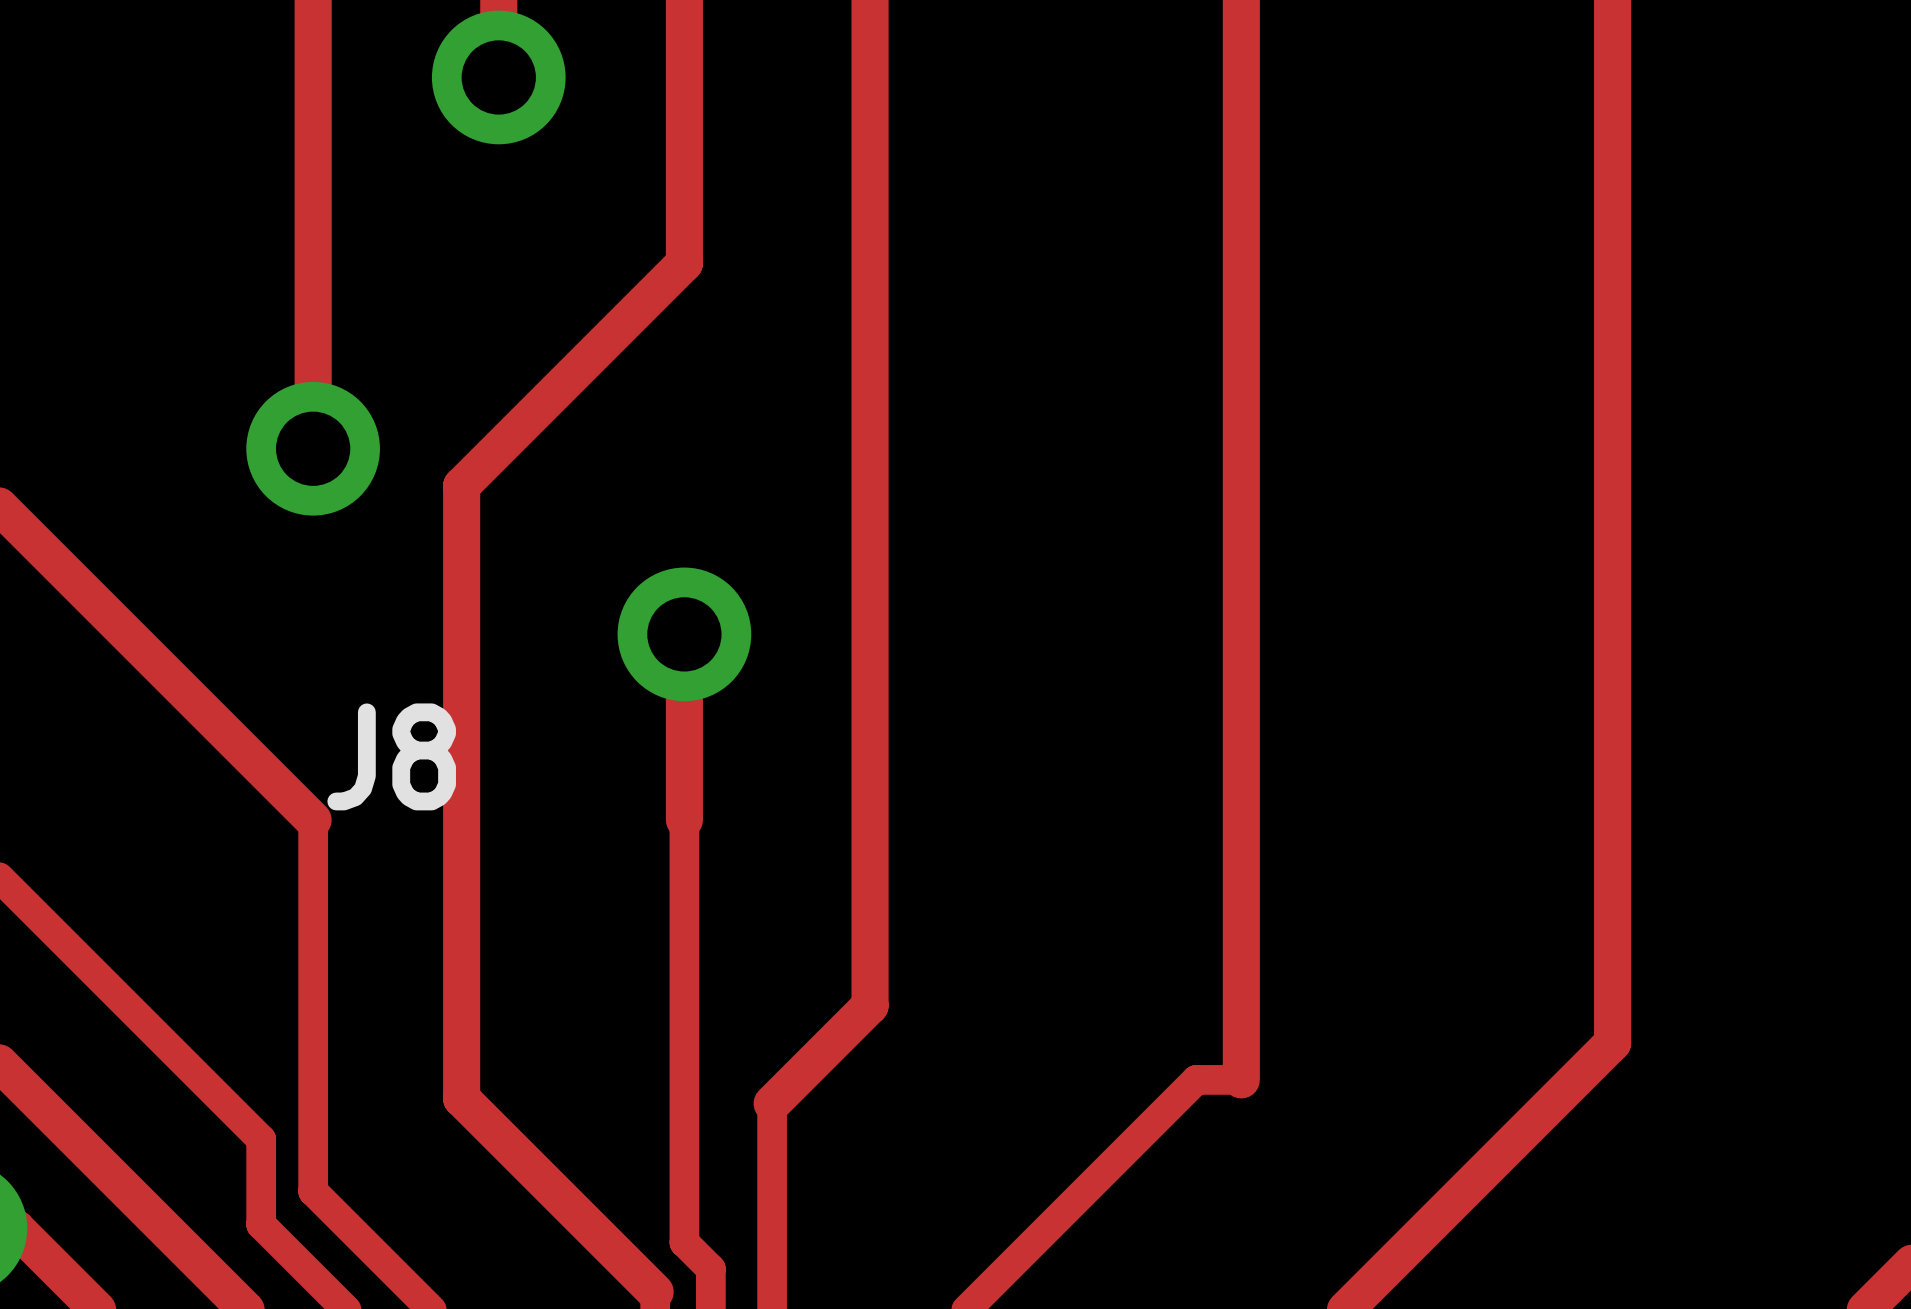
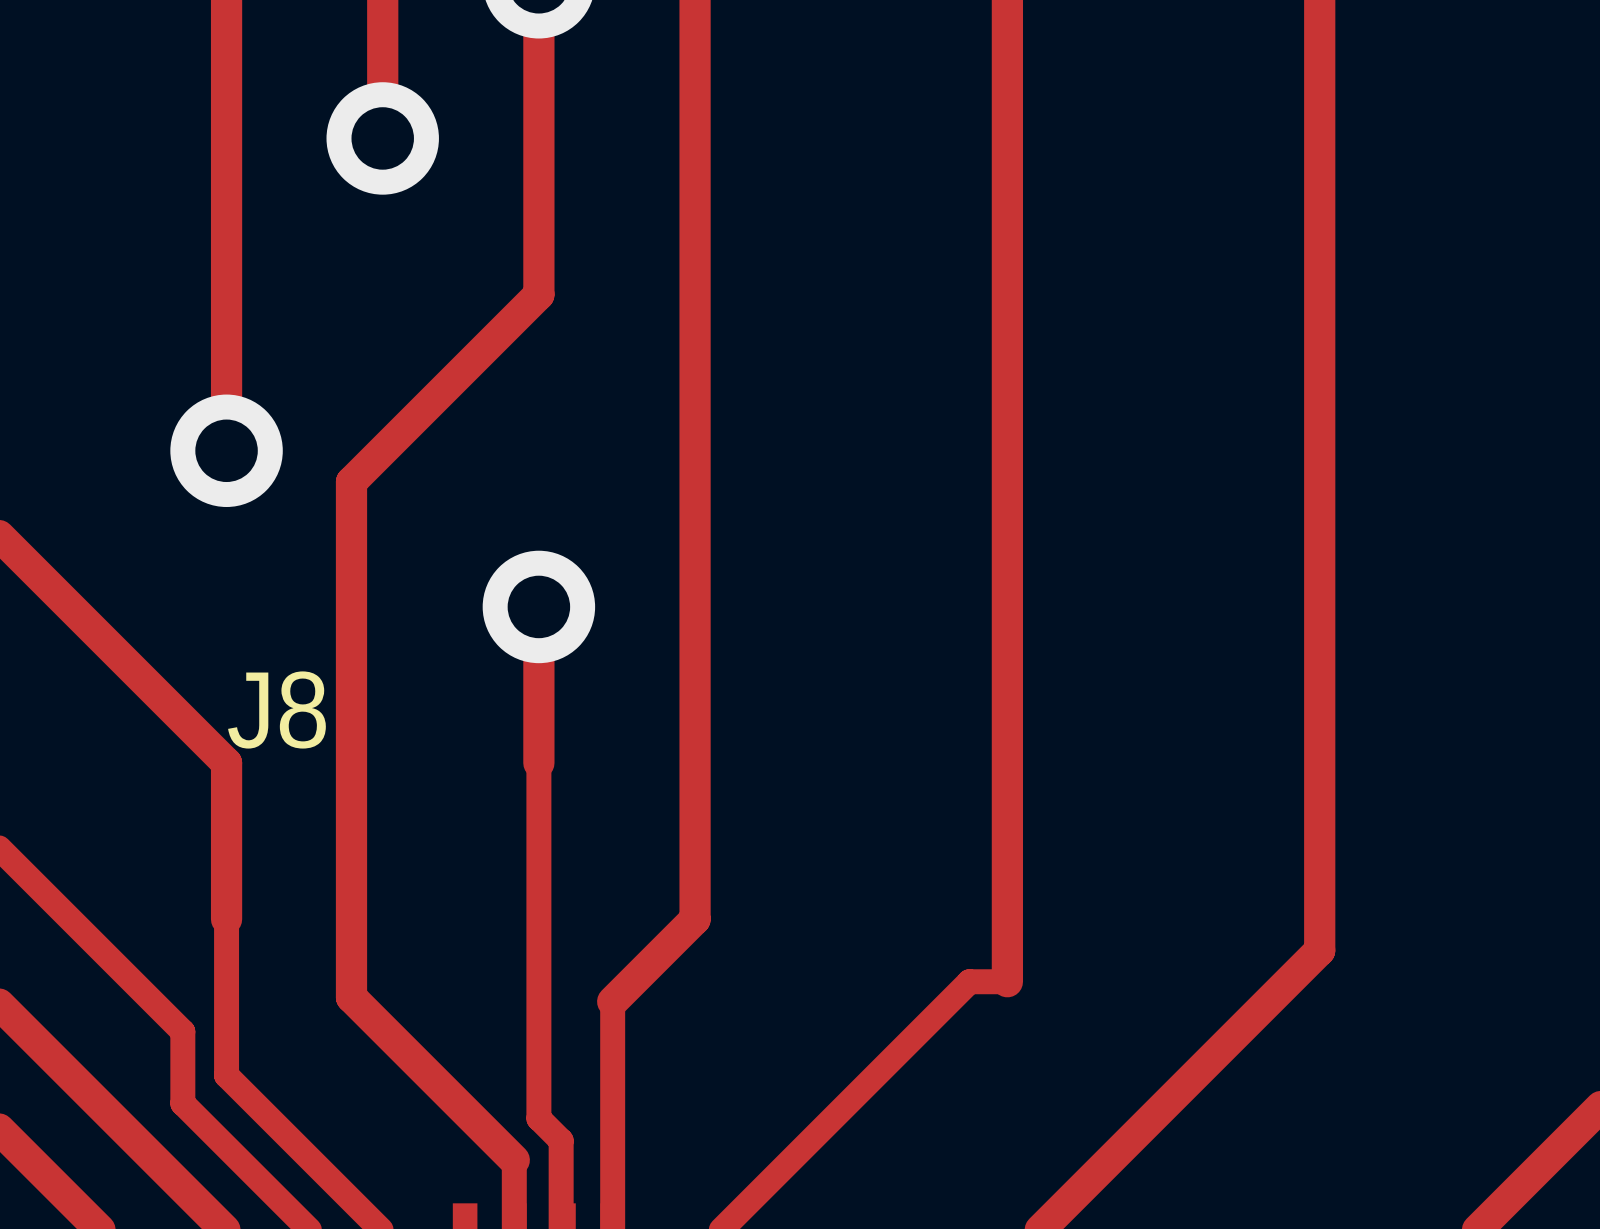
track width: thin (313, 820) (313, 1005) -> thick (226, 763) (226, 919)

